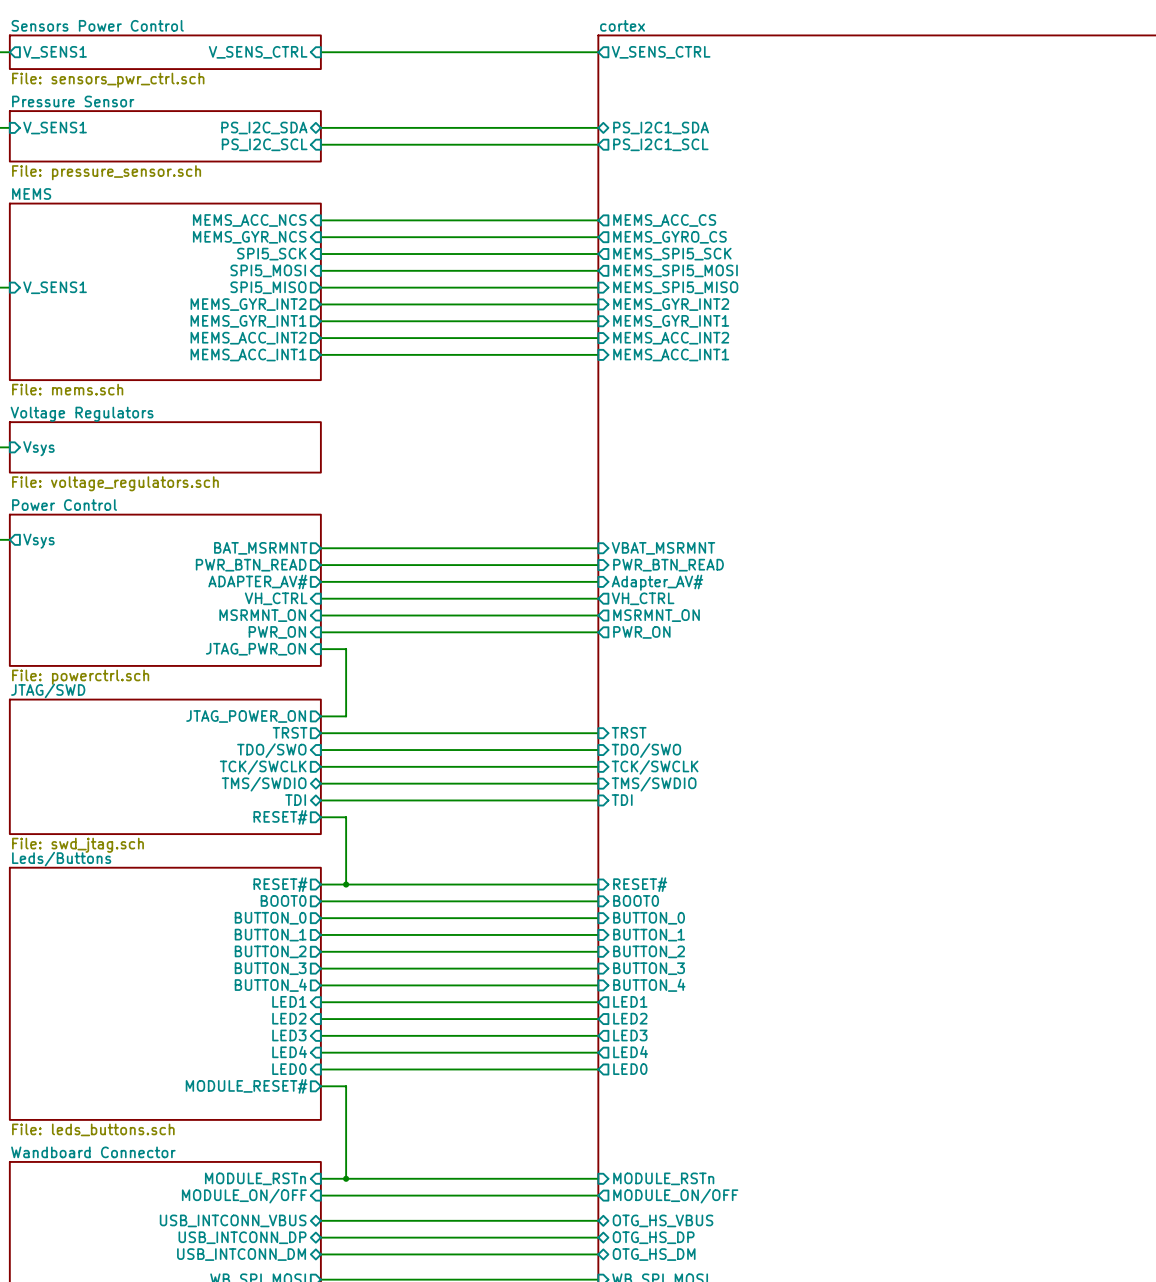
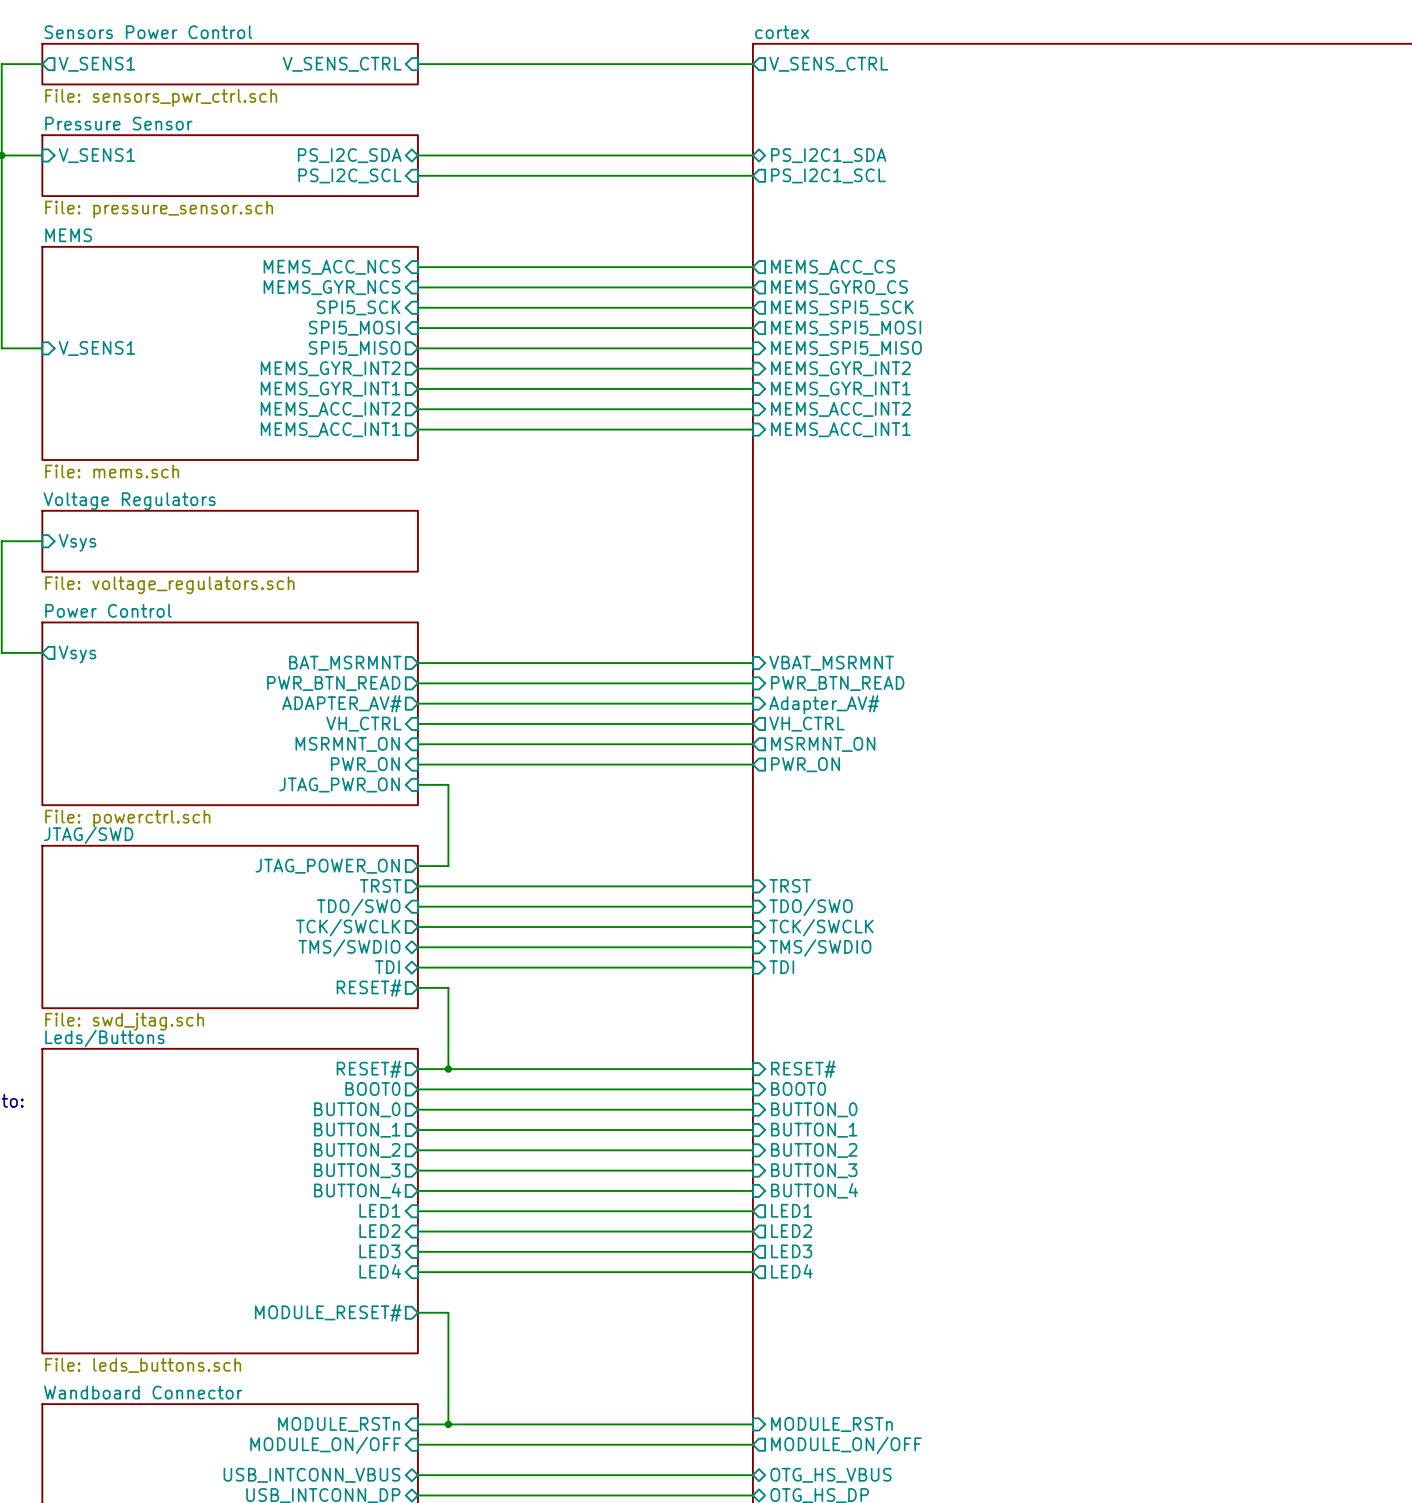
sheet pin: LED0 (289, 1069) -> none
wire: (320, 1069) (598, 1069) -> none
sheet pin: LED0 (630, 1069) -> none

